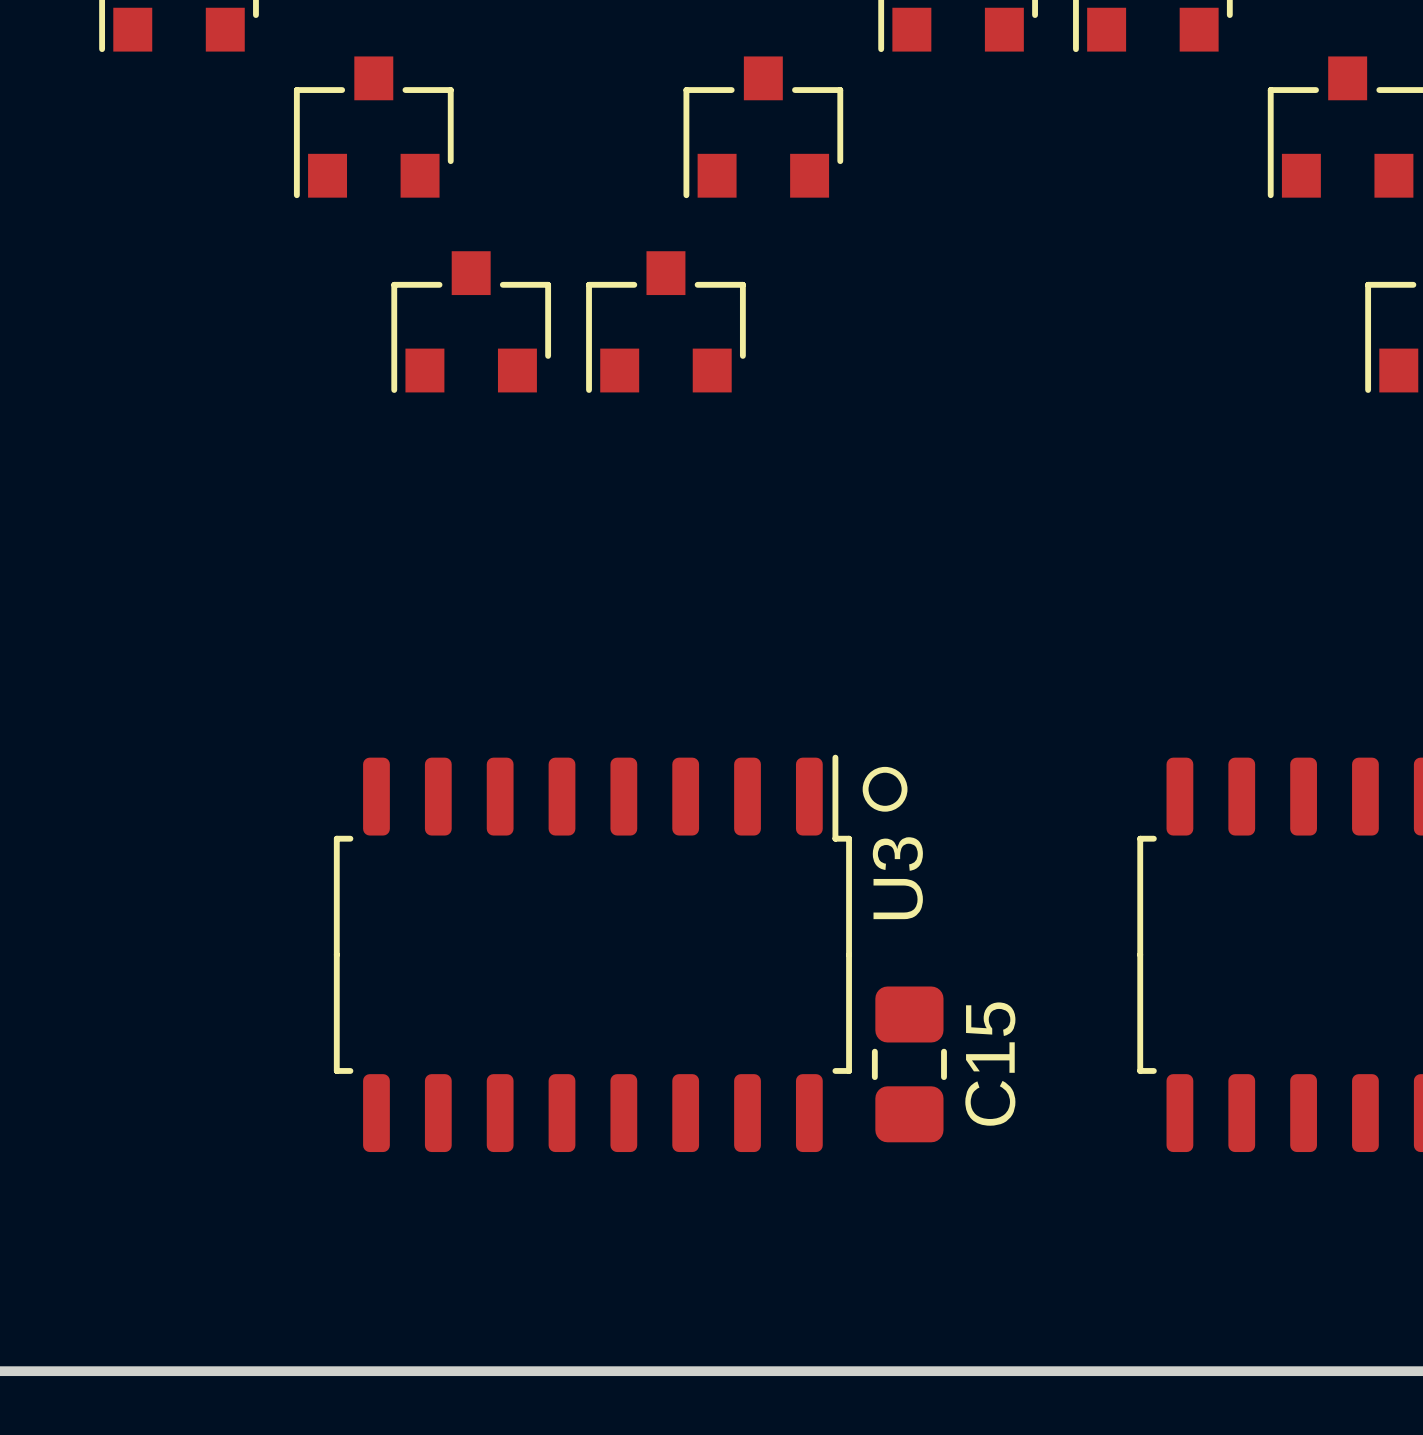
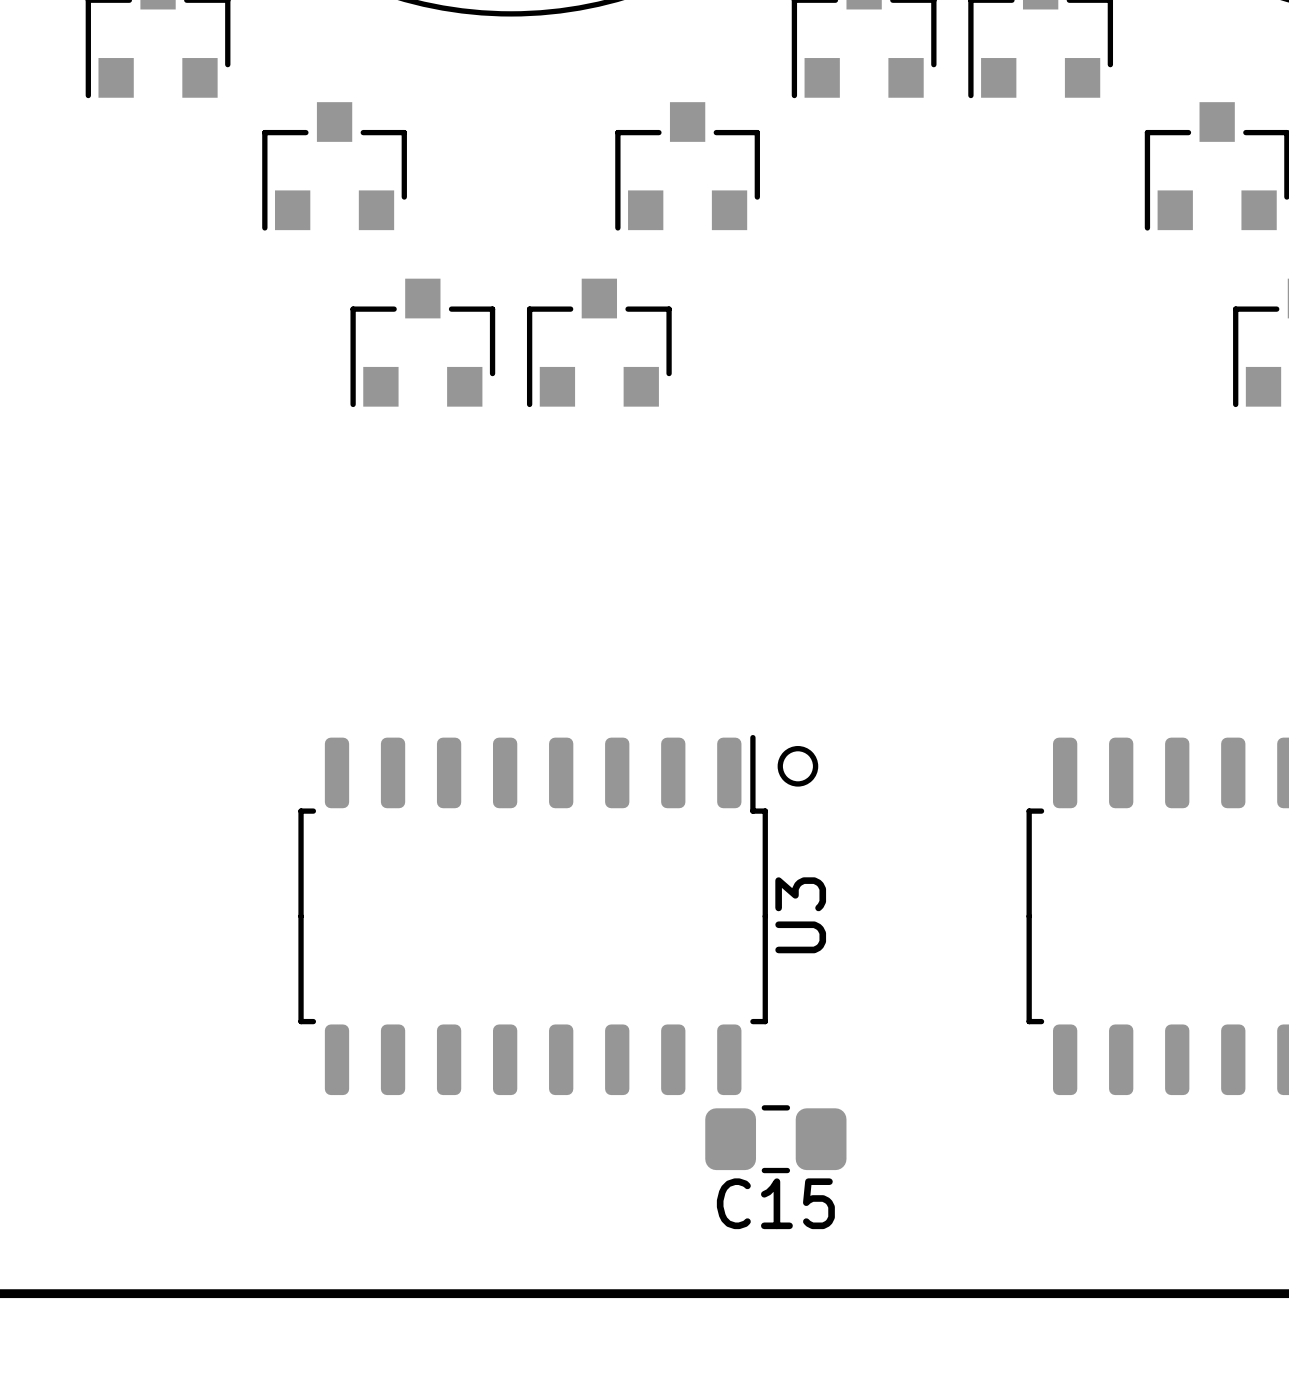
U3 name position: U3 (897, 878) -> U3 (800, 915)
C15 rotation: 0° (909, 1064) -> 90° clockwise (775, 1139)
C15 position: (909, 1064) -> (775, 1139)

